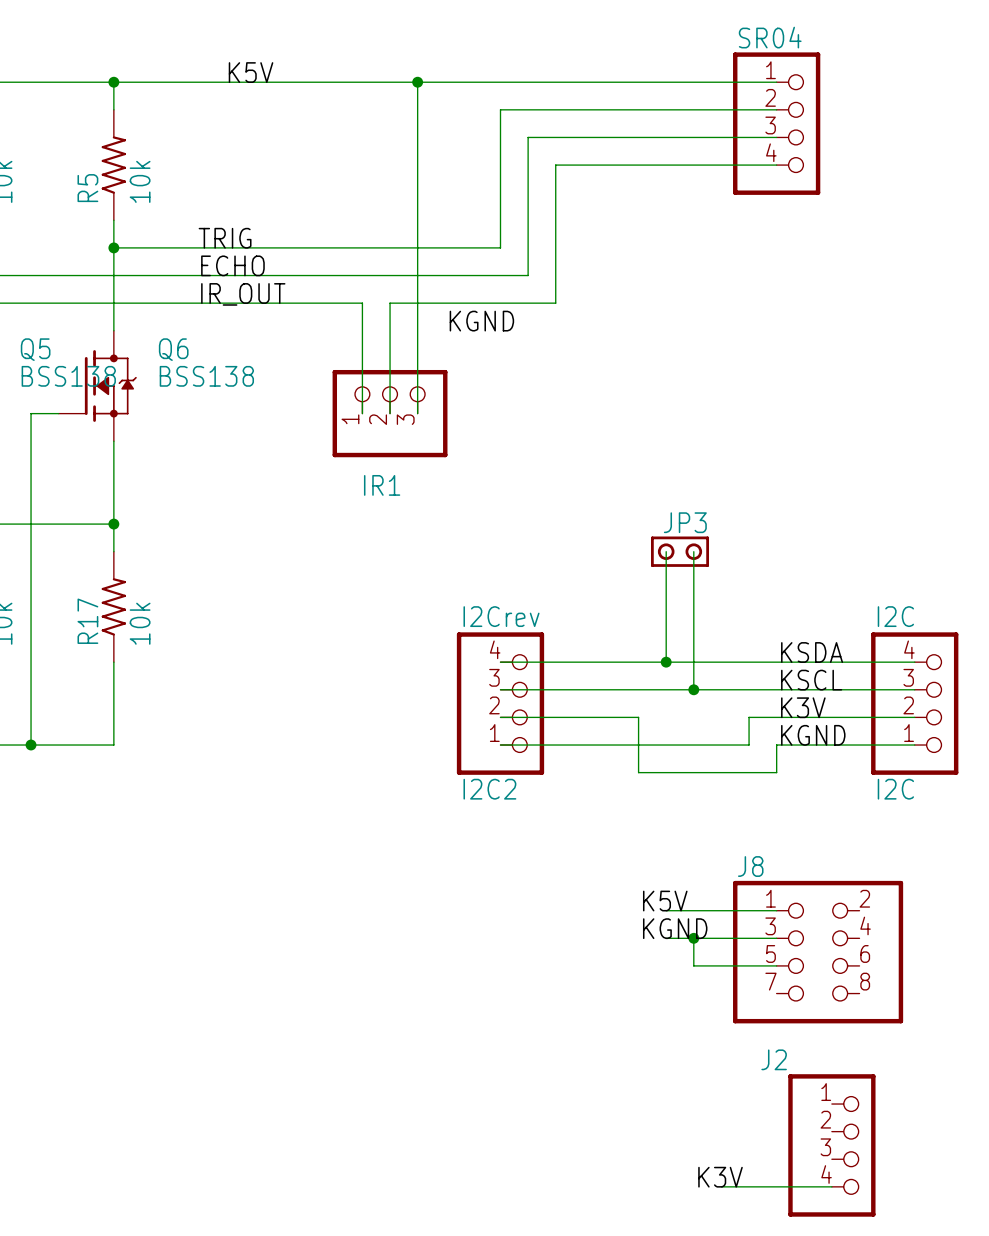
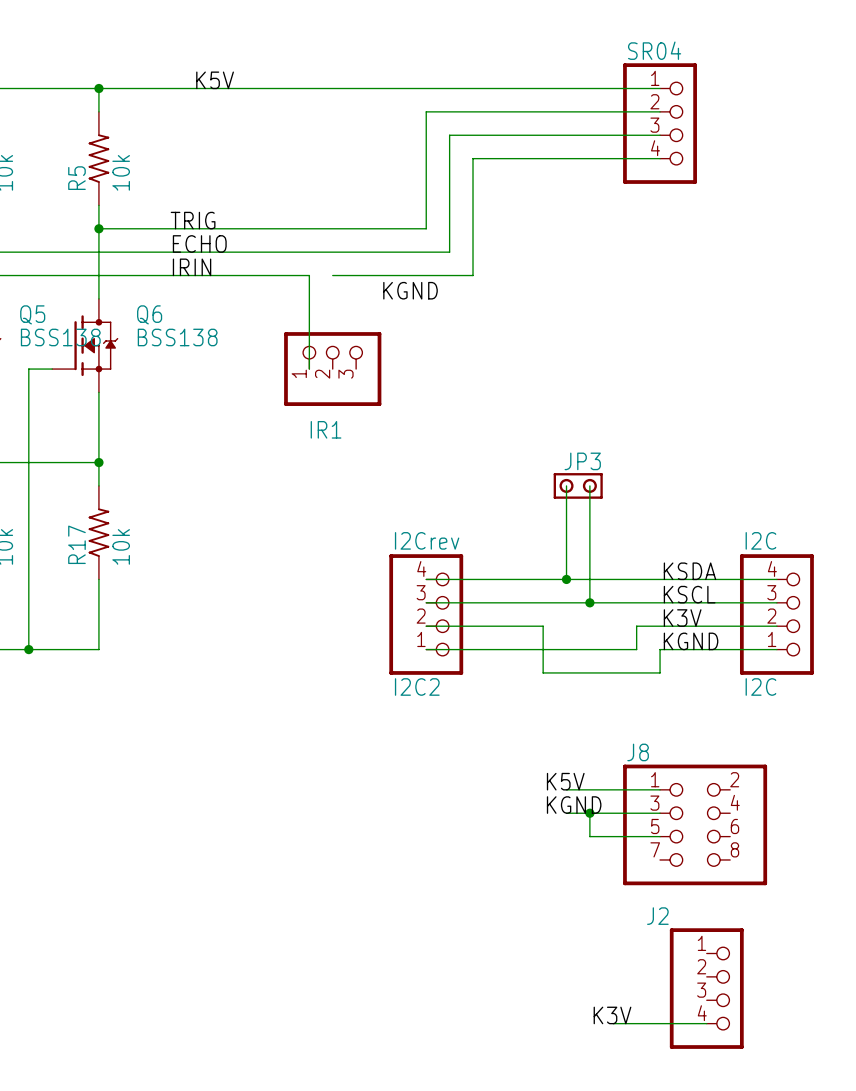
wire: (417, 82) (417, 413) -> none
junction: (417, 82) -> none
label: IR_OUT (243, 294) -> IRIN (192, 267)
wire: (390, 303) (390, 413) -> none

